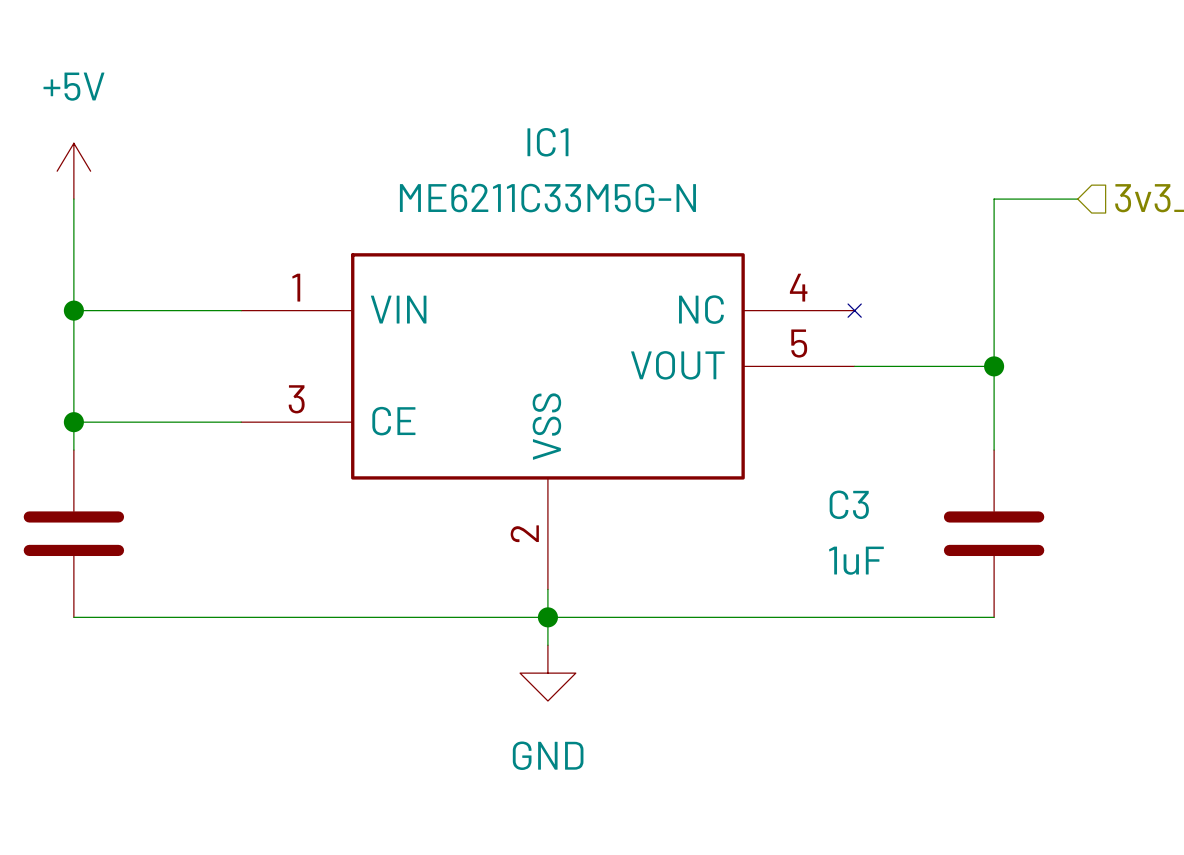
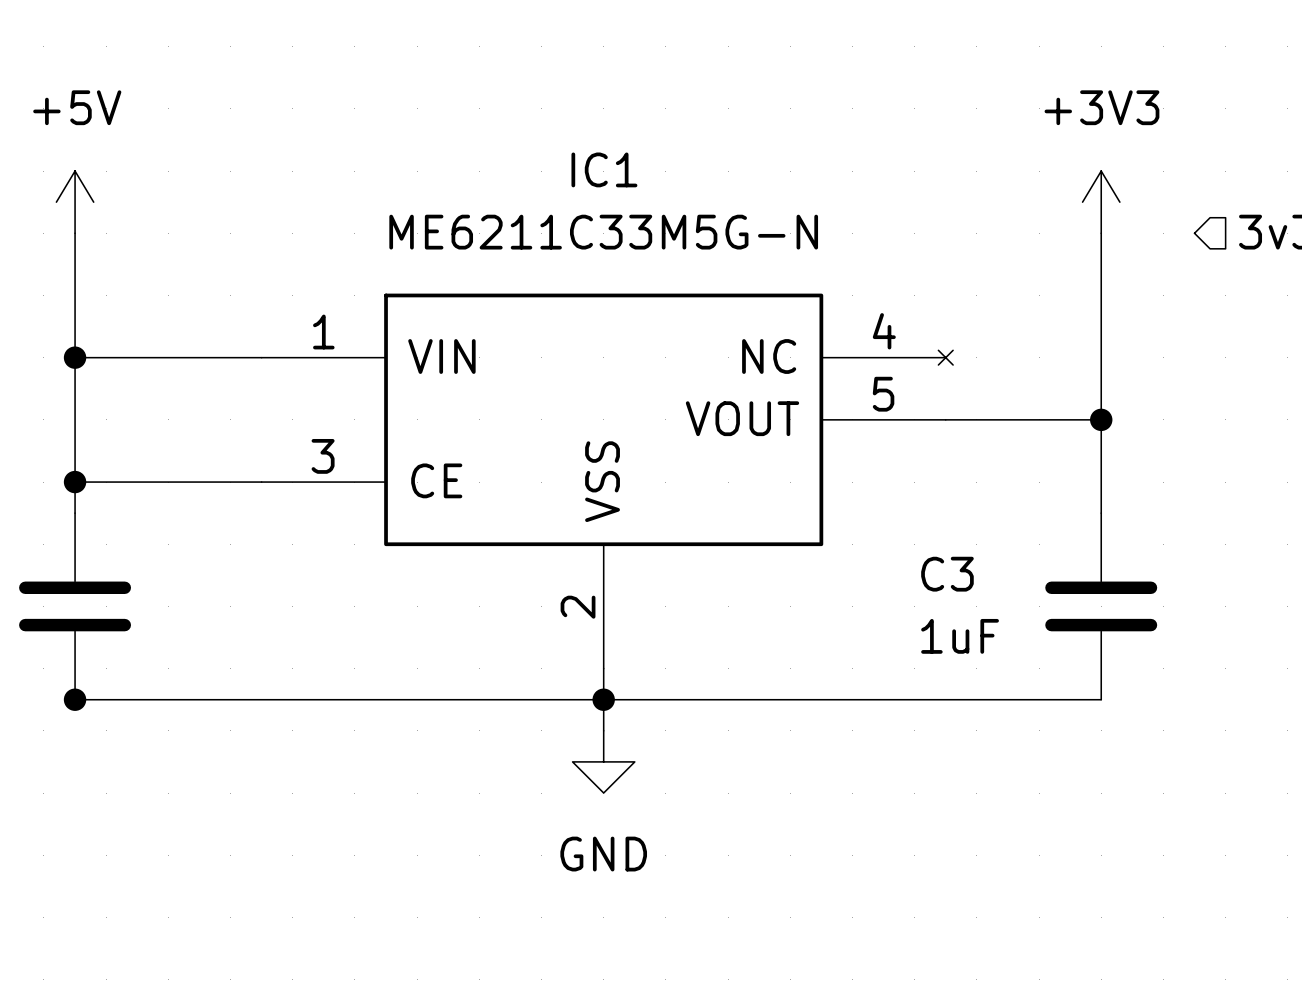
power symbol: none -> +3V3 (1101, 202)
wire: (994, 199) (1077, 199) -> none
junction: none -> (75, 699)

